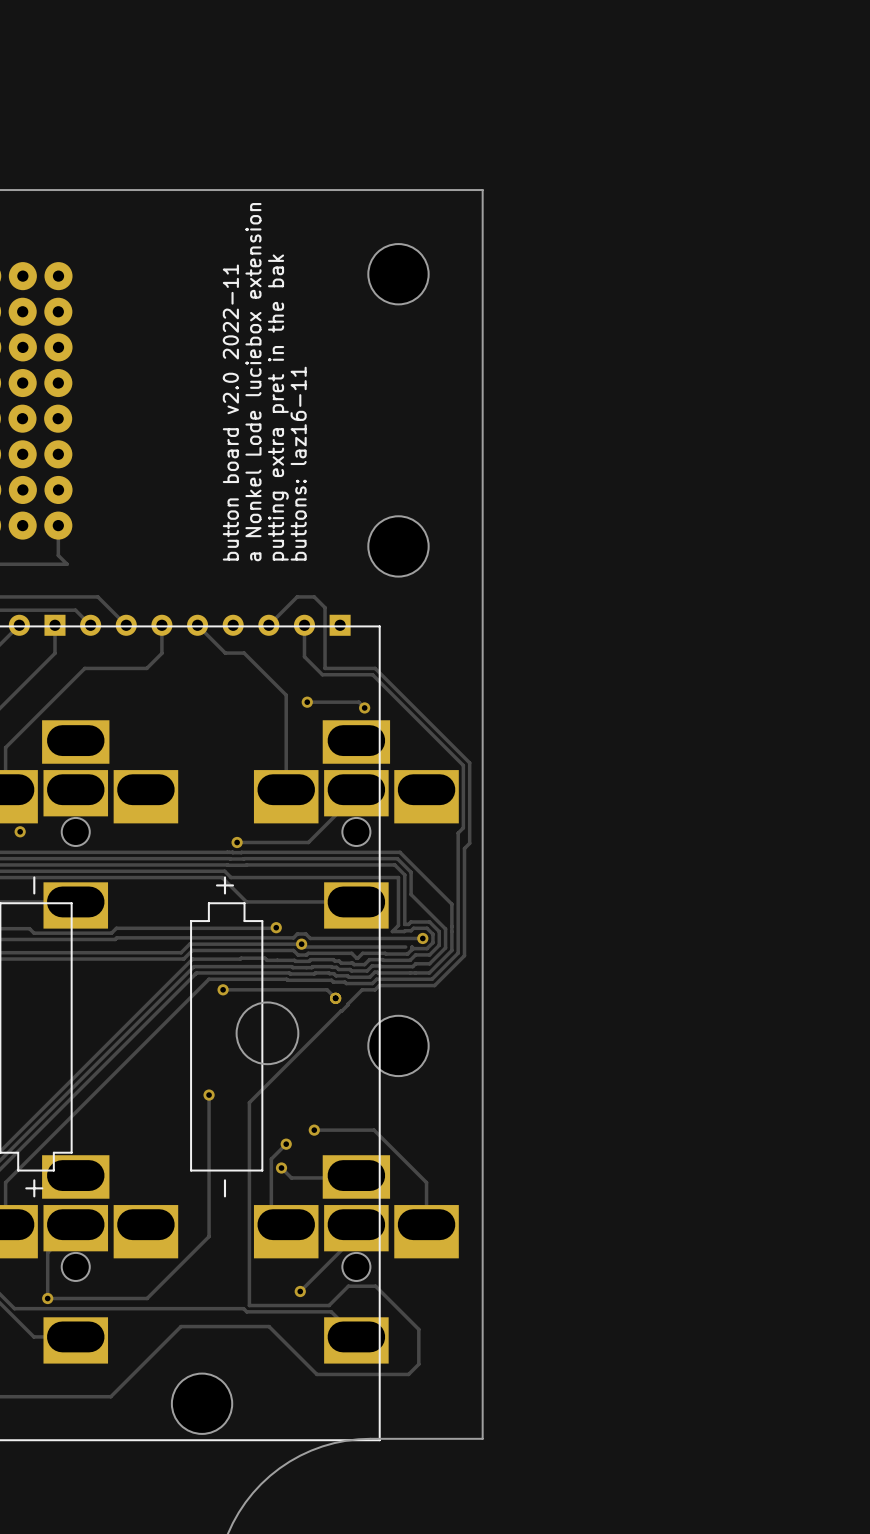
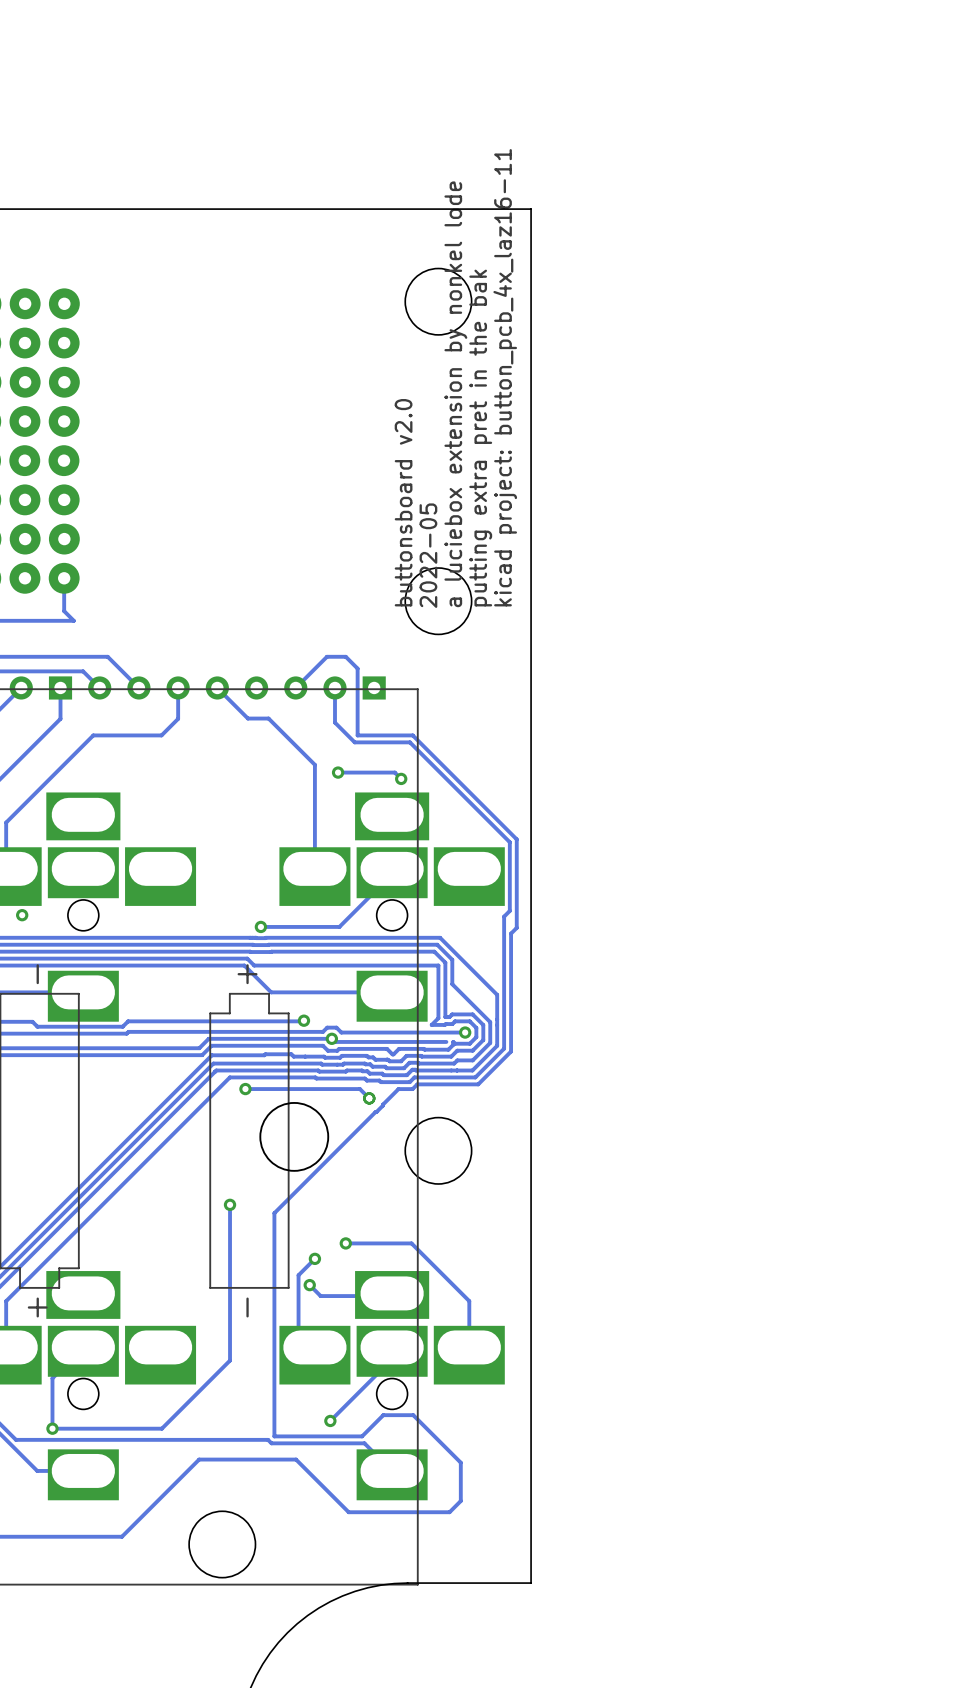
text: none -> kicad project: button_pcb_4x_laz16-11 (505, 377)
text: none -> a luciebox extension by nonkel lode (455, 394)
text: a Nonkel Lode luciebox extension (253, 382) -> none
text position: putting extra pret in the bak (278, 407) -> putting extra pret in the bak (480, 438)
text: button board v2.0 2022-11 (230, 412) -> none
text: none -> buttonsboard v2.0 (403, 502)
text: buttons: laz16-11 (298, 463) -> none
text: none -> 2022-05 (428, 555)

